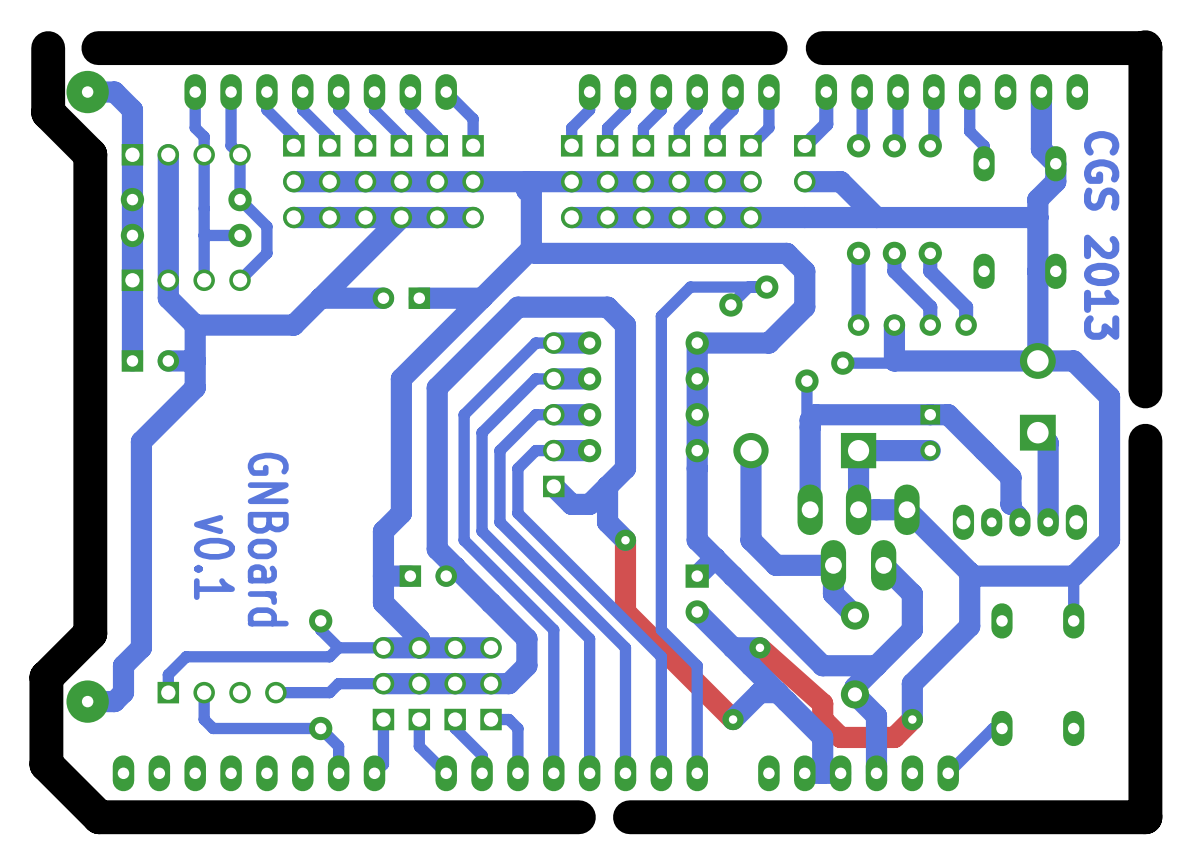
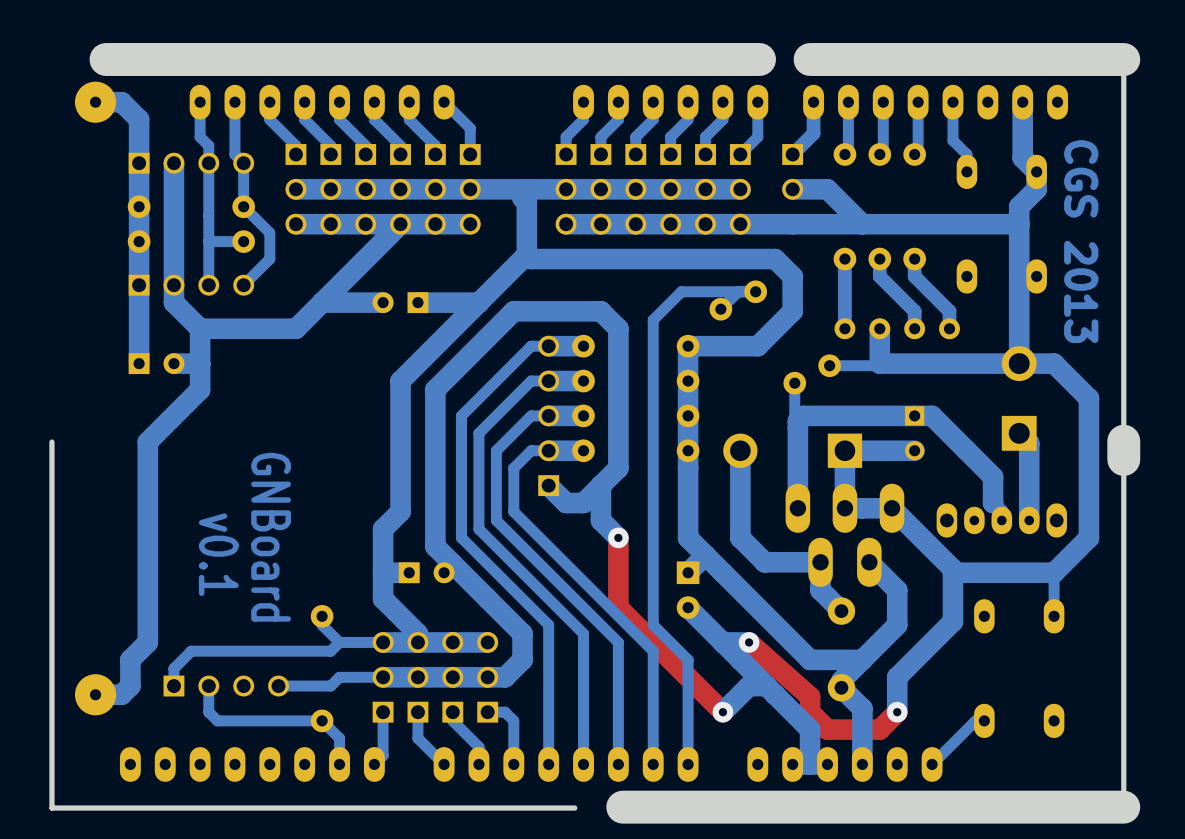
board edge width: thick (1145, 47) (1145, 391) -> thin (1123, 58) (1123, 393)
board edge: (48, 48) (48, 112) (90, 154) (90, 633) (46, 677) (46, 764) (99, 817) (578, 817) -> none
board edge: none -> (1123, 393) (1123, 424)
board edge: none -> (51, 442) (51, 808) (574, 808)
board edge width: thick (1145, 459) (1145, 817) -> thin (1123, 459) (1123, 807)

